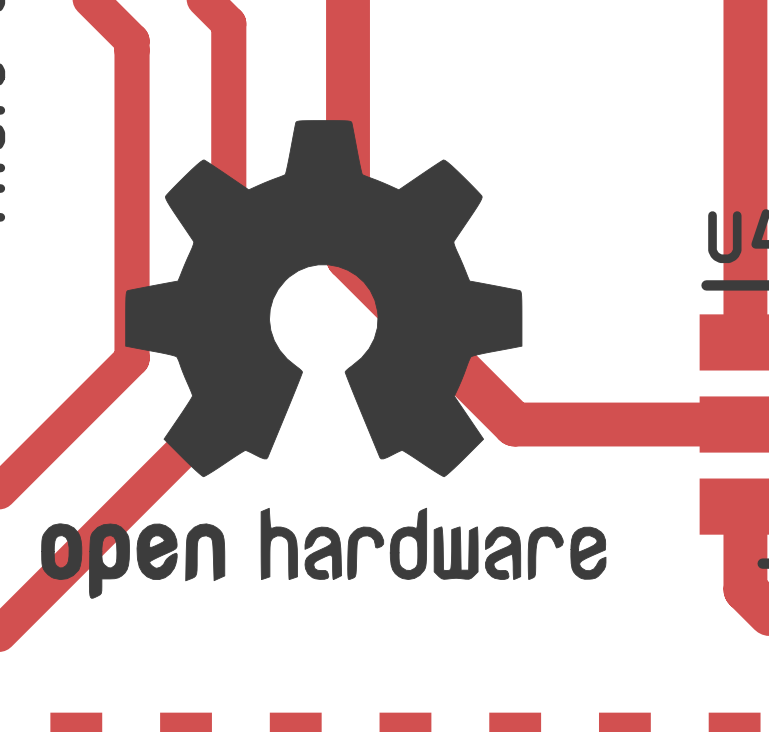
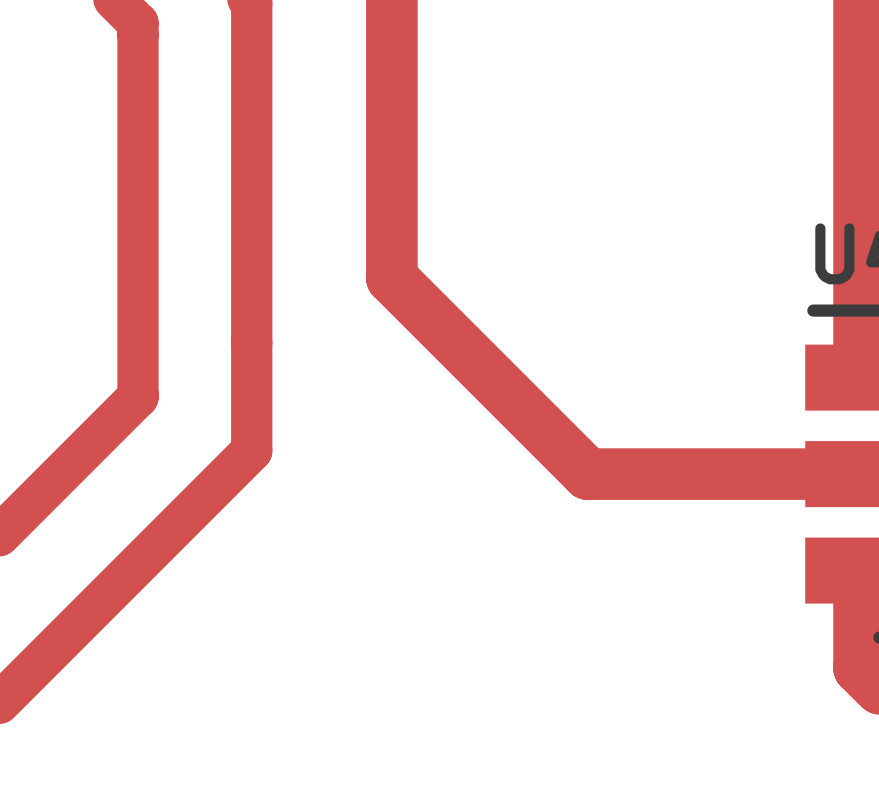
drawing: [41, 120, 607, 599] -> none

